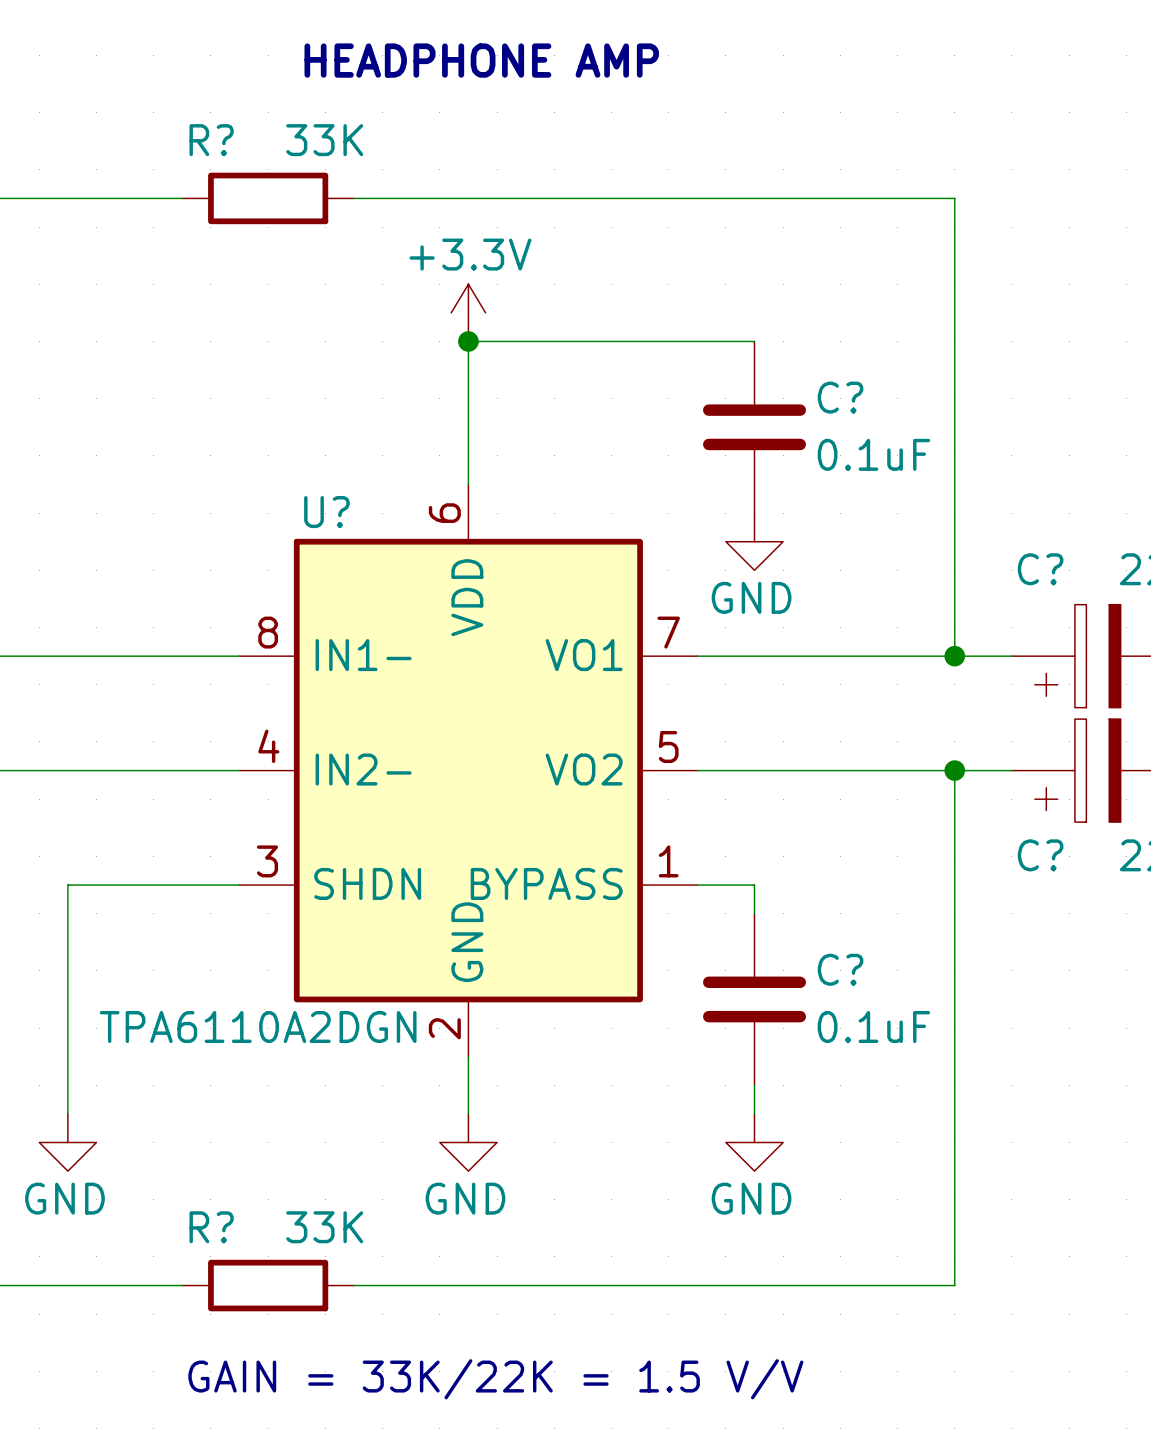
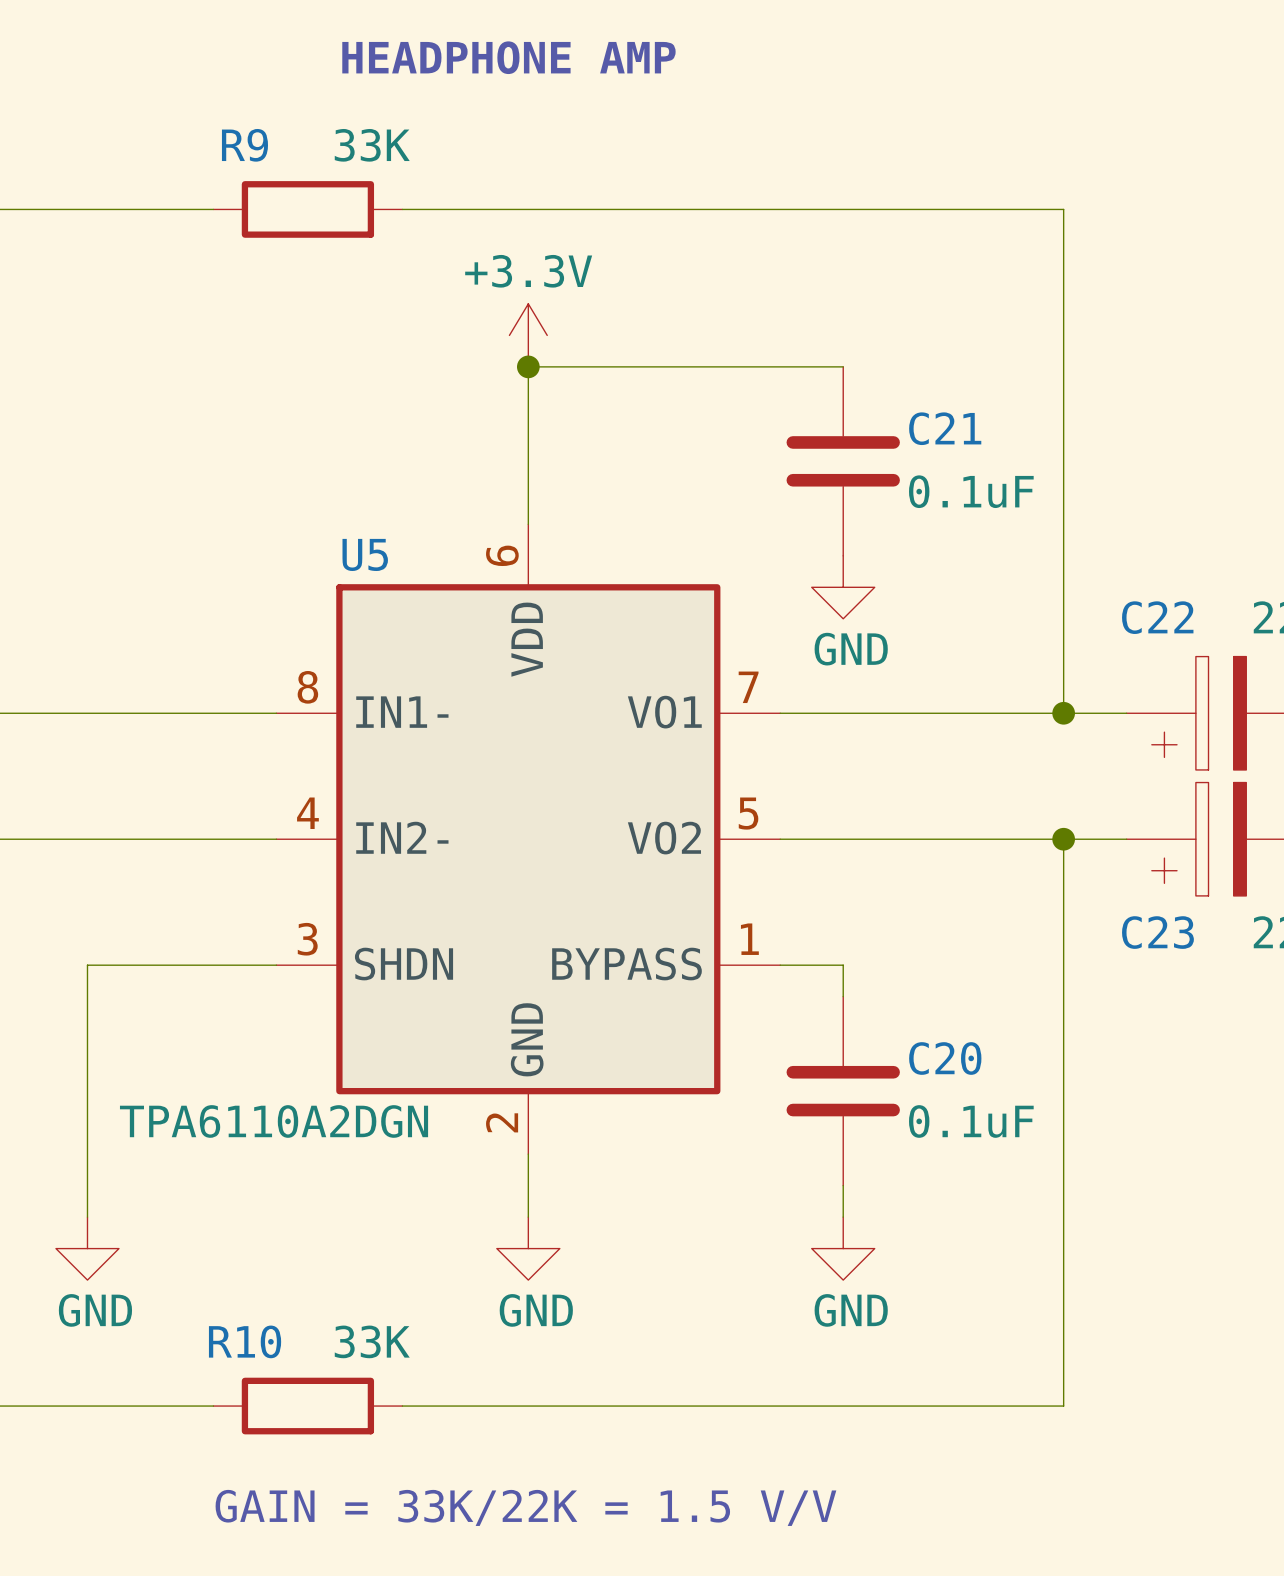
R? name: R? (211, 140) -> R9 (244, 145)
C? name: C? (840, 397) -> C21 (945, 428)
U? name: U? (326, 512) -> U5 (365, 554)
C? name: C? (1040, 569) -> C22 (1157, 617)
C? name: C? (1040, 855) -> C23 (1157, 932)
C? name: C? (840, 969) -> C20 (945, 1058)
R? name: R? (211, 1227) -> R10 (245, 1341)

